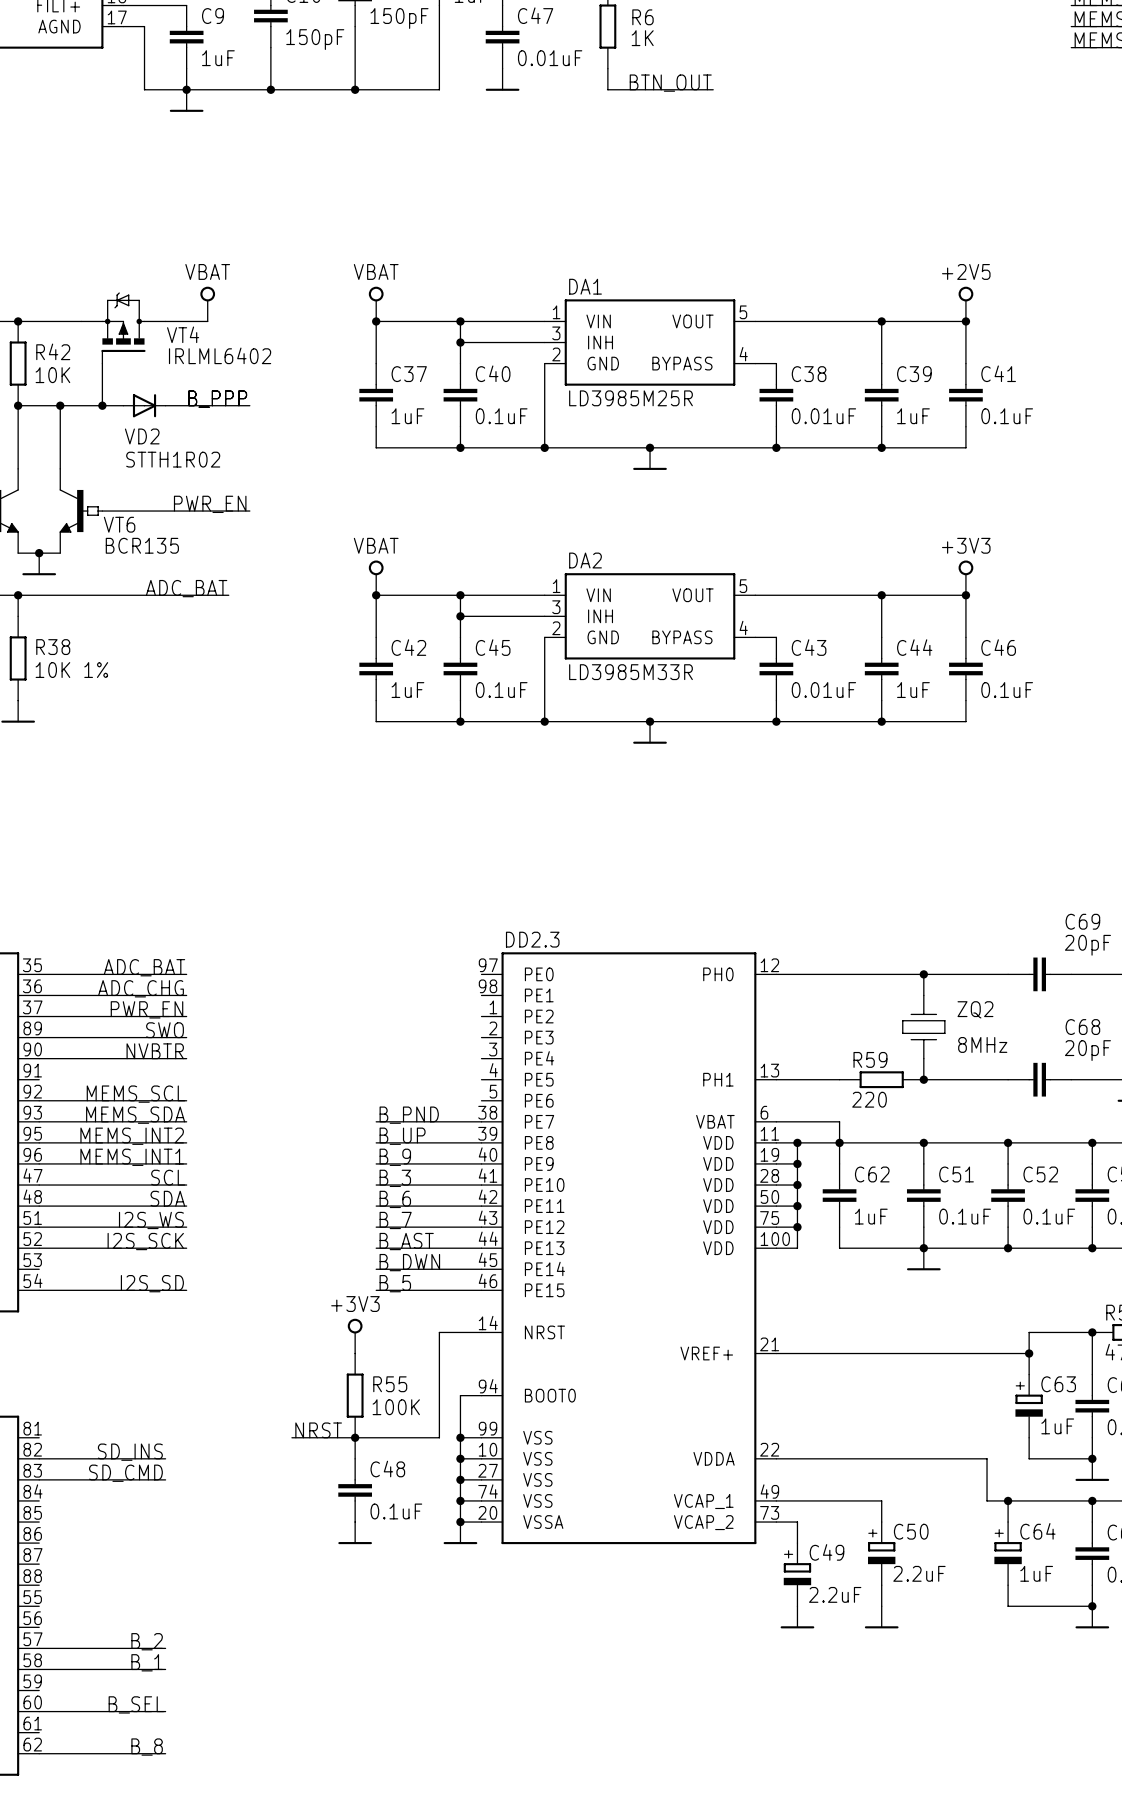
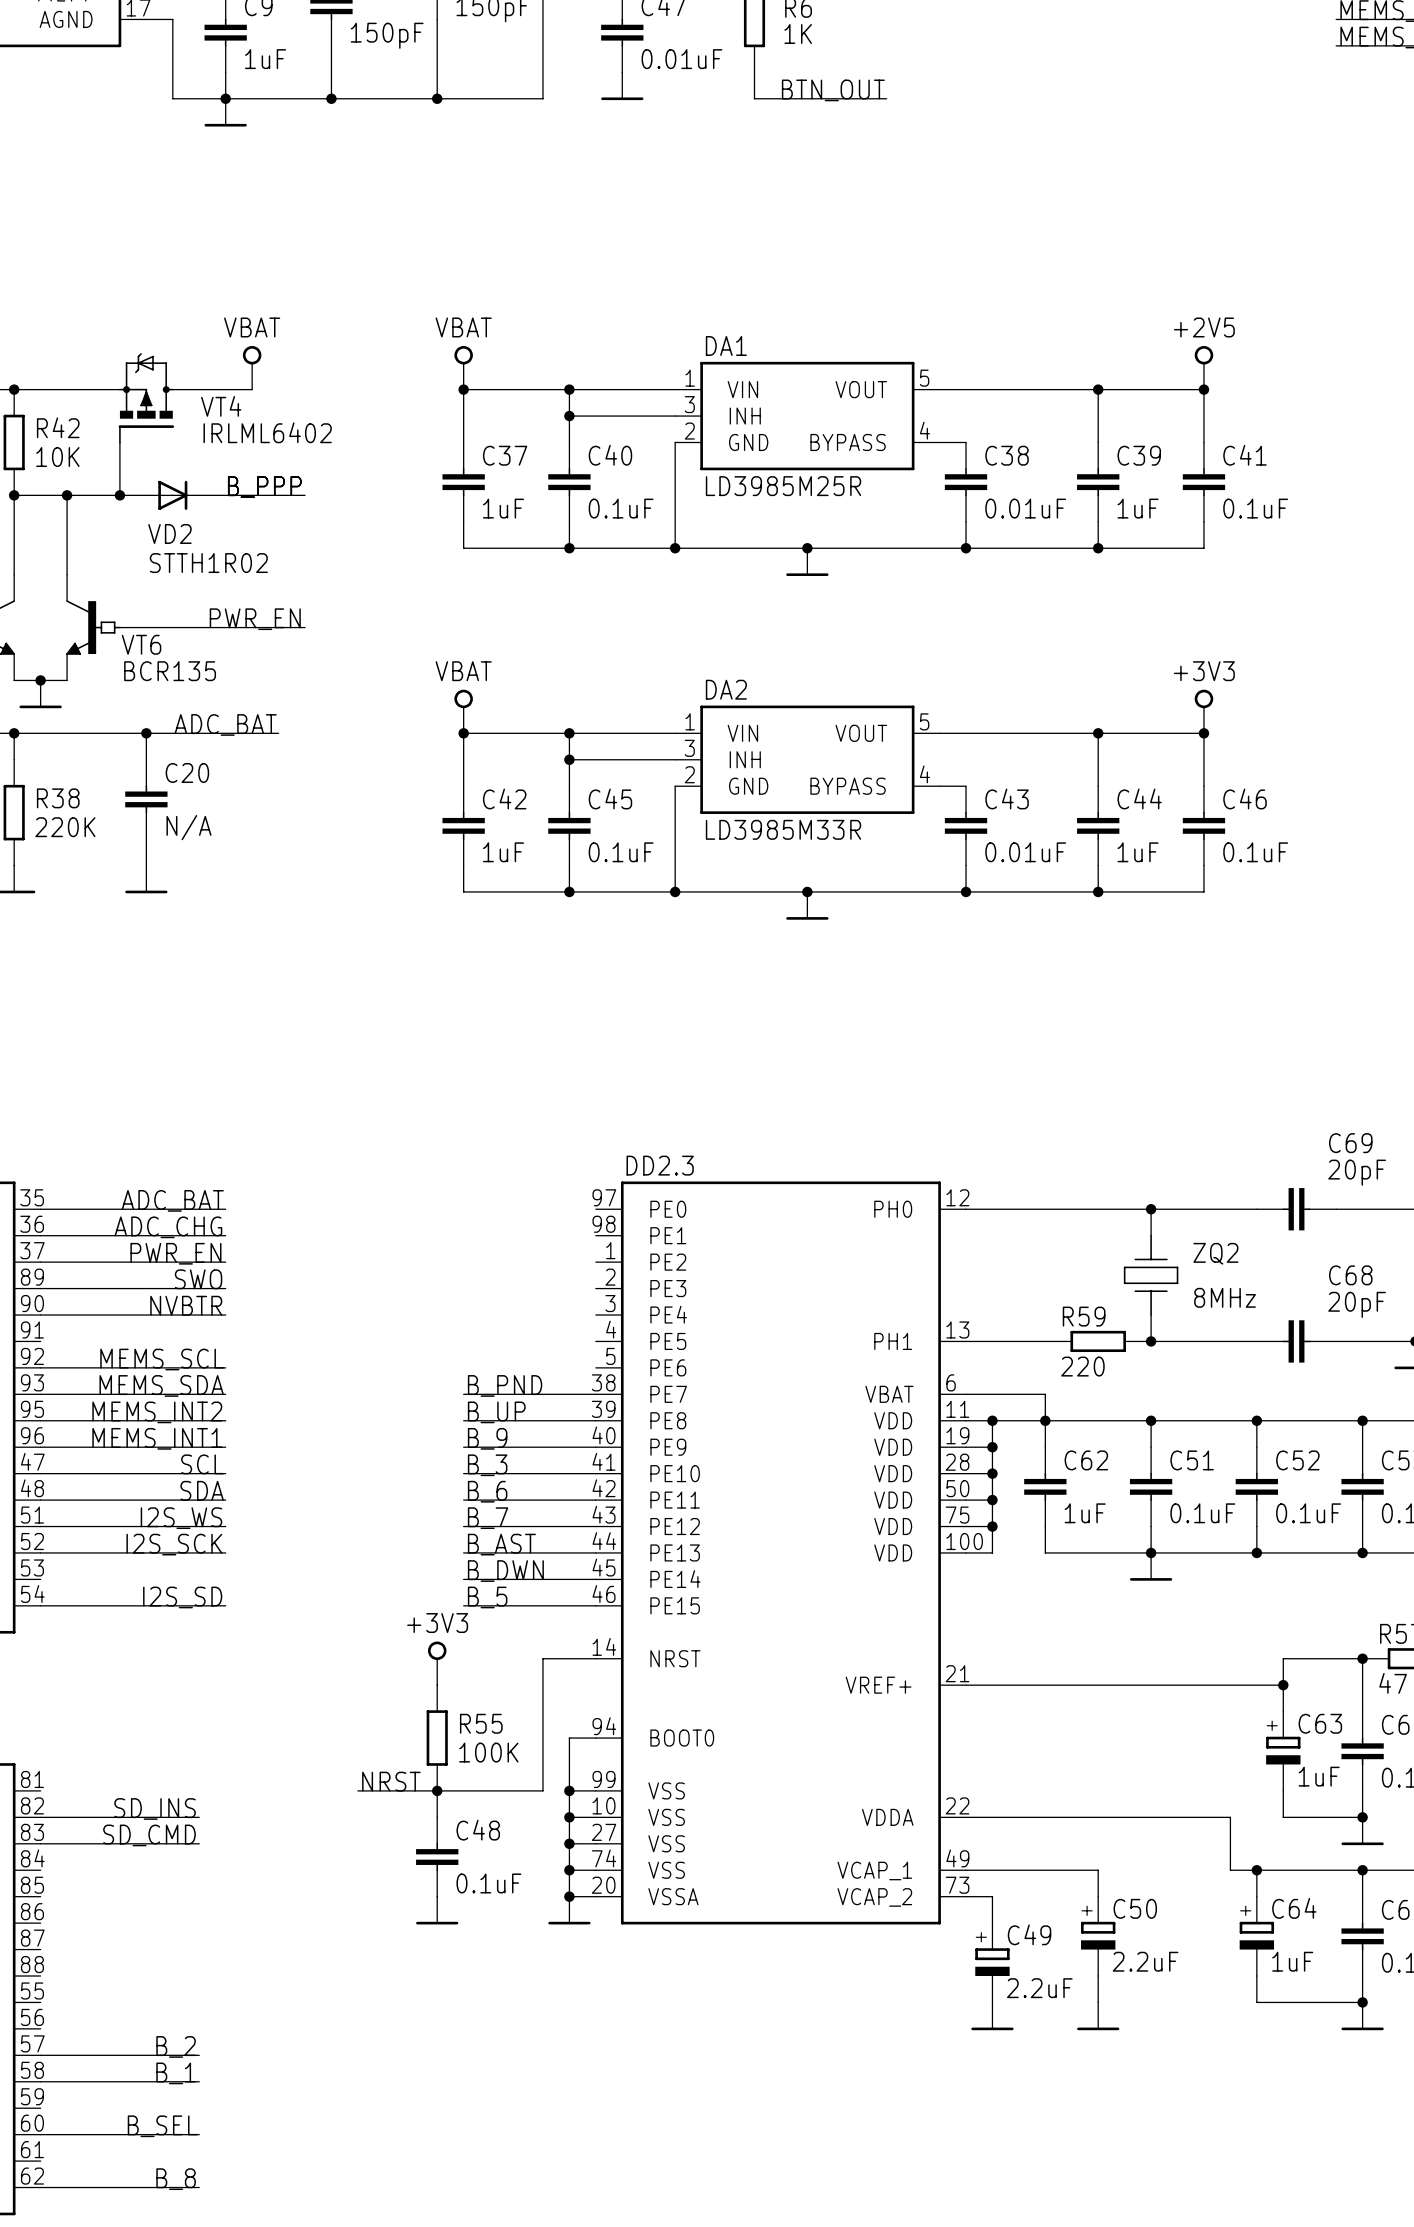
wire: none -> (146, 733) (146, 759)
junction: none -> (146, 733)
C20: none -> N/A (146, 799)
R38 value: 10K 1% (71, 670) -> 220K (65, 827)
wire: none -> (146, 839) (146, 865)
power symbol: none -> (146, 879)

